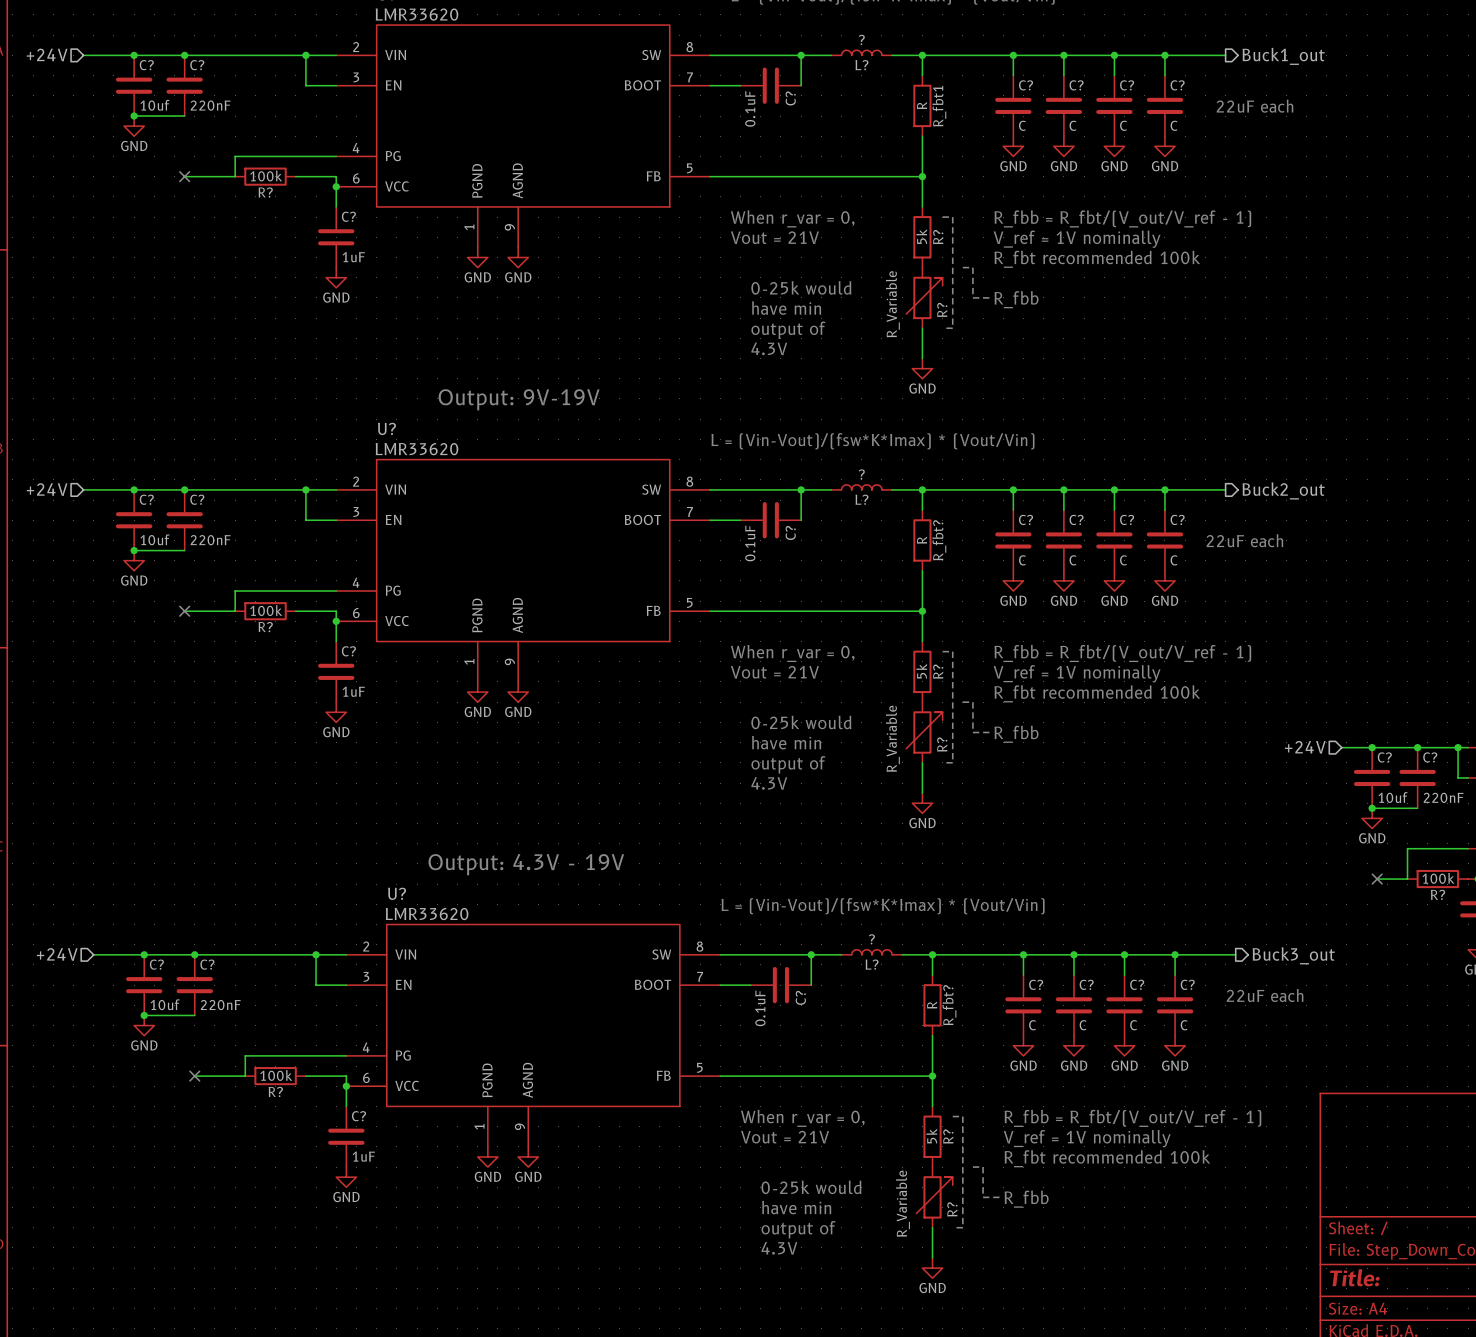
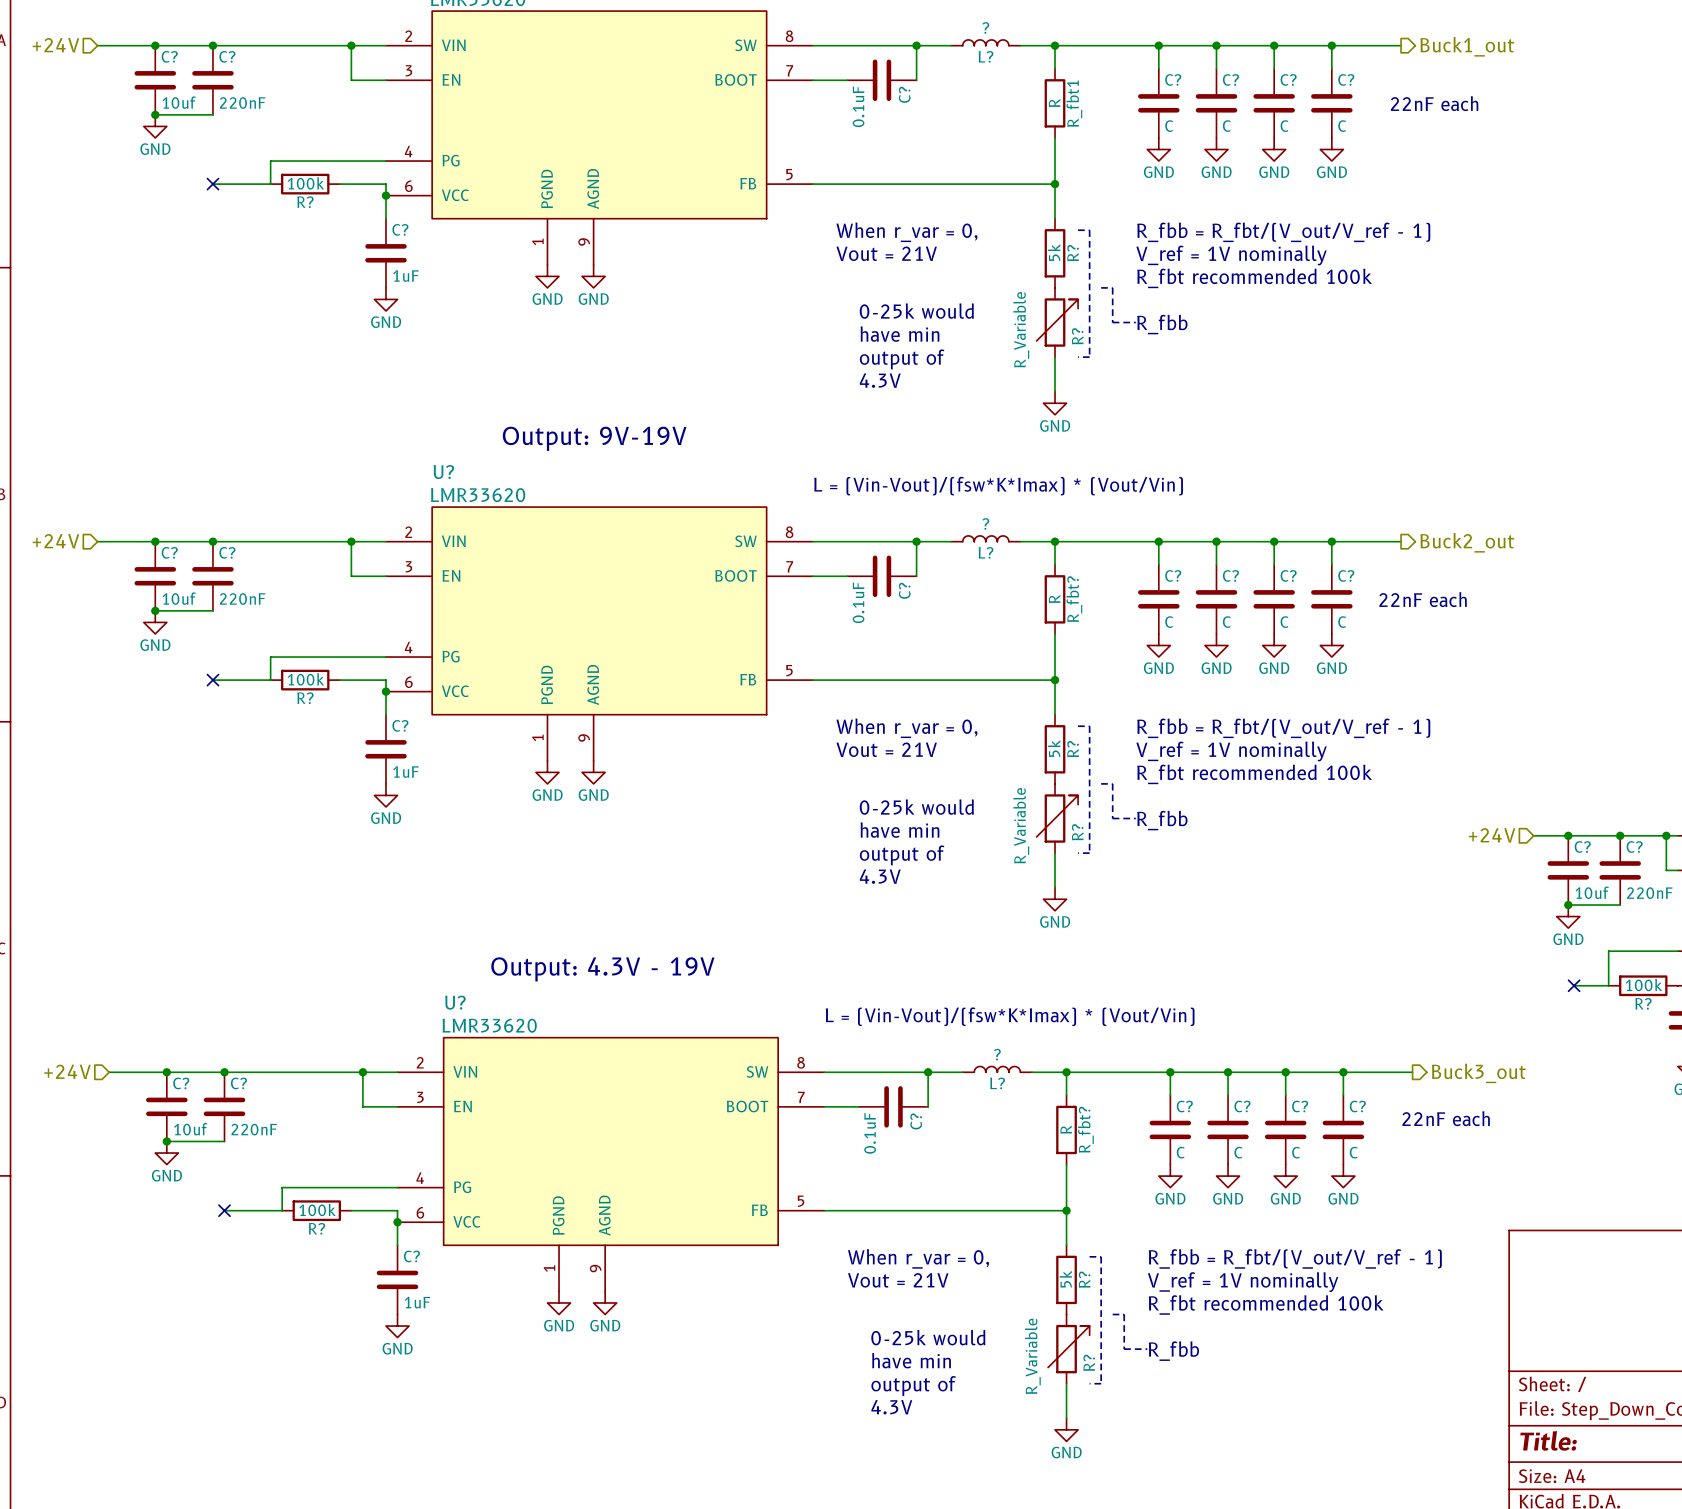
text: 22uF each (1254, 106) -> 22nF each (1434, 103)
text: 22uF each (1244, 540) -> 22nF each (1423, 599)
text: 22uF each (1265, 995) -> 22nF each (1446, 1118)

